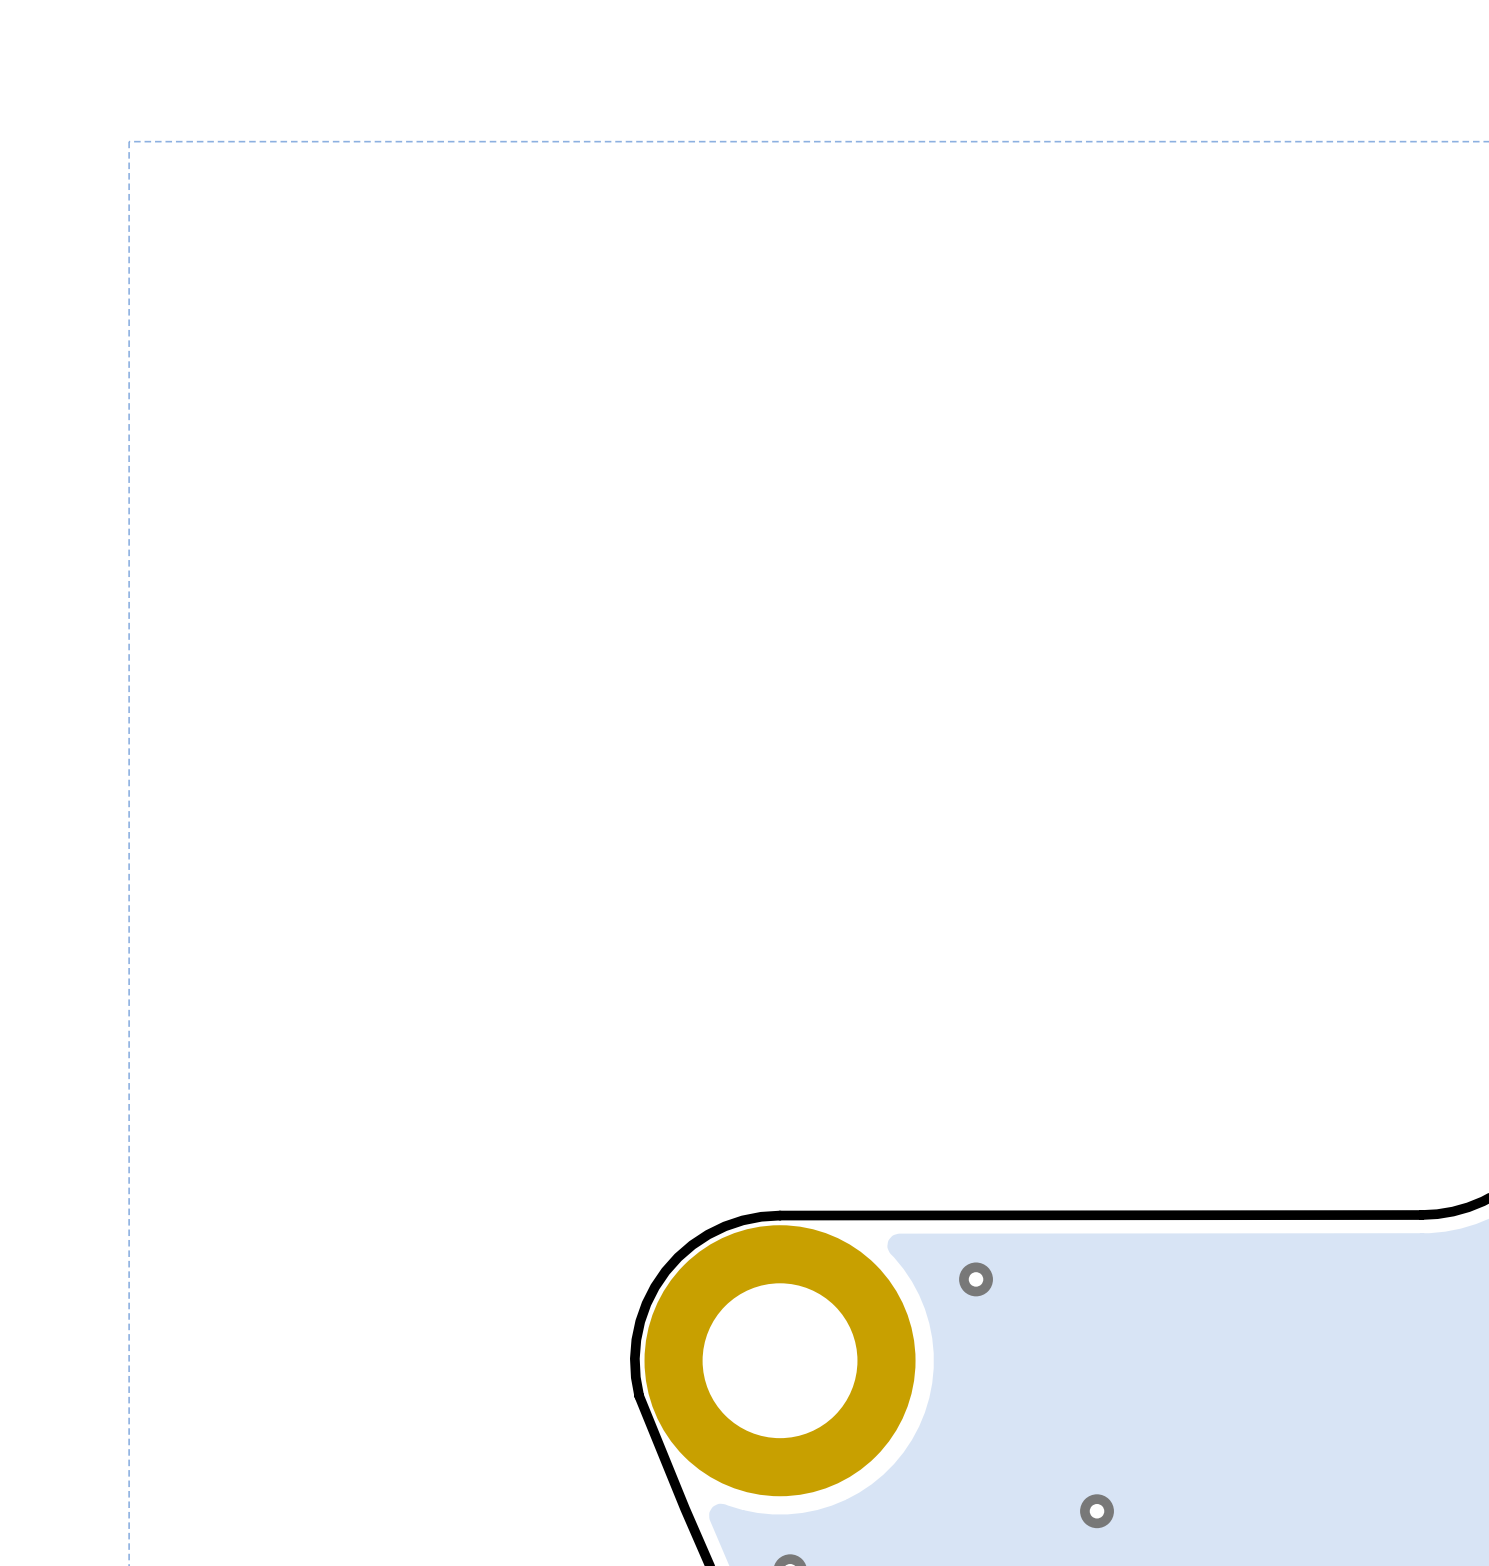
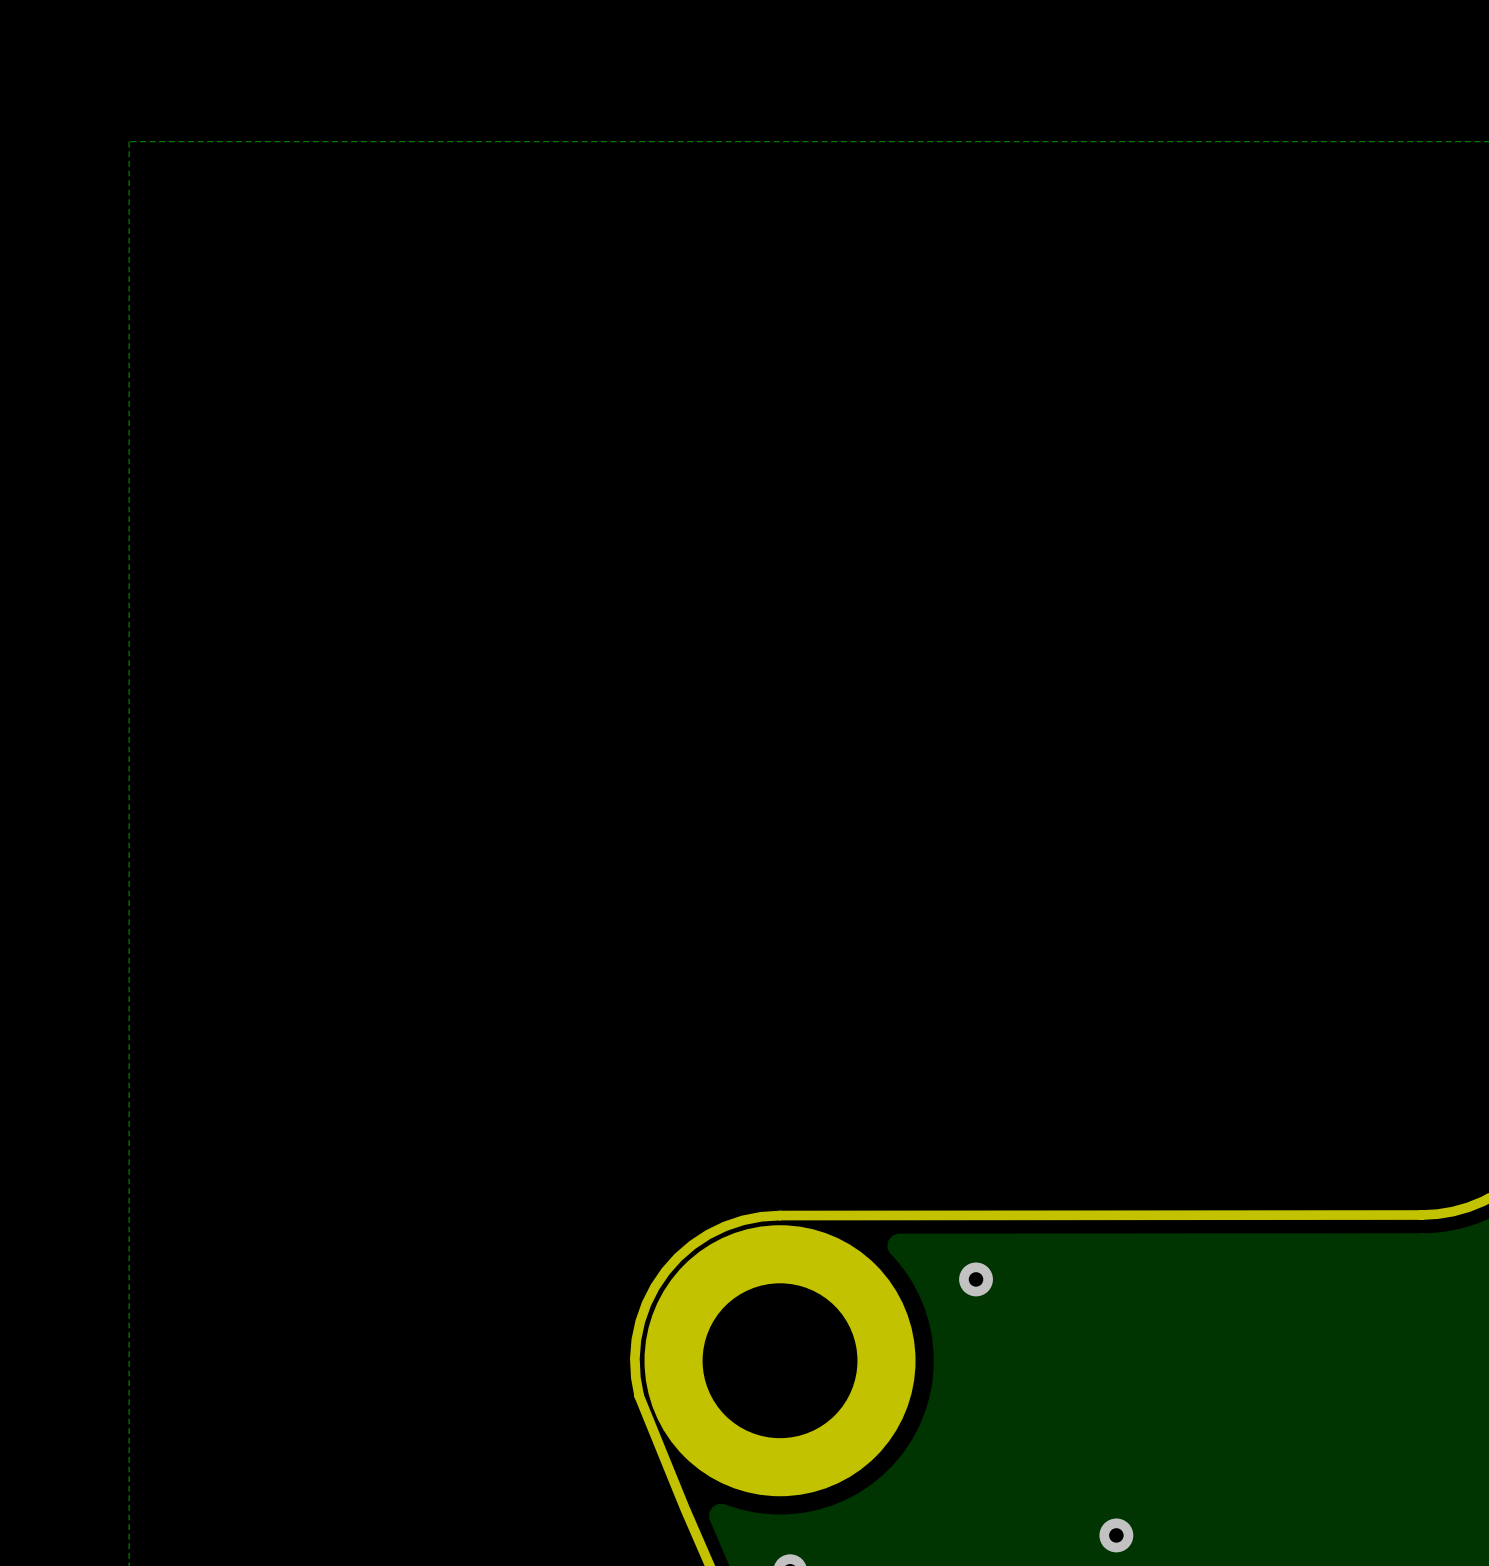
via position: (1097, 1511) -> (1116, 1535)

